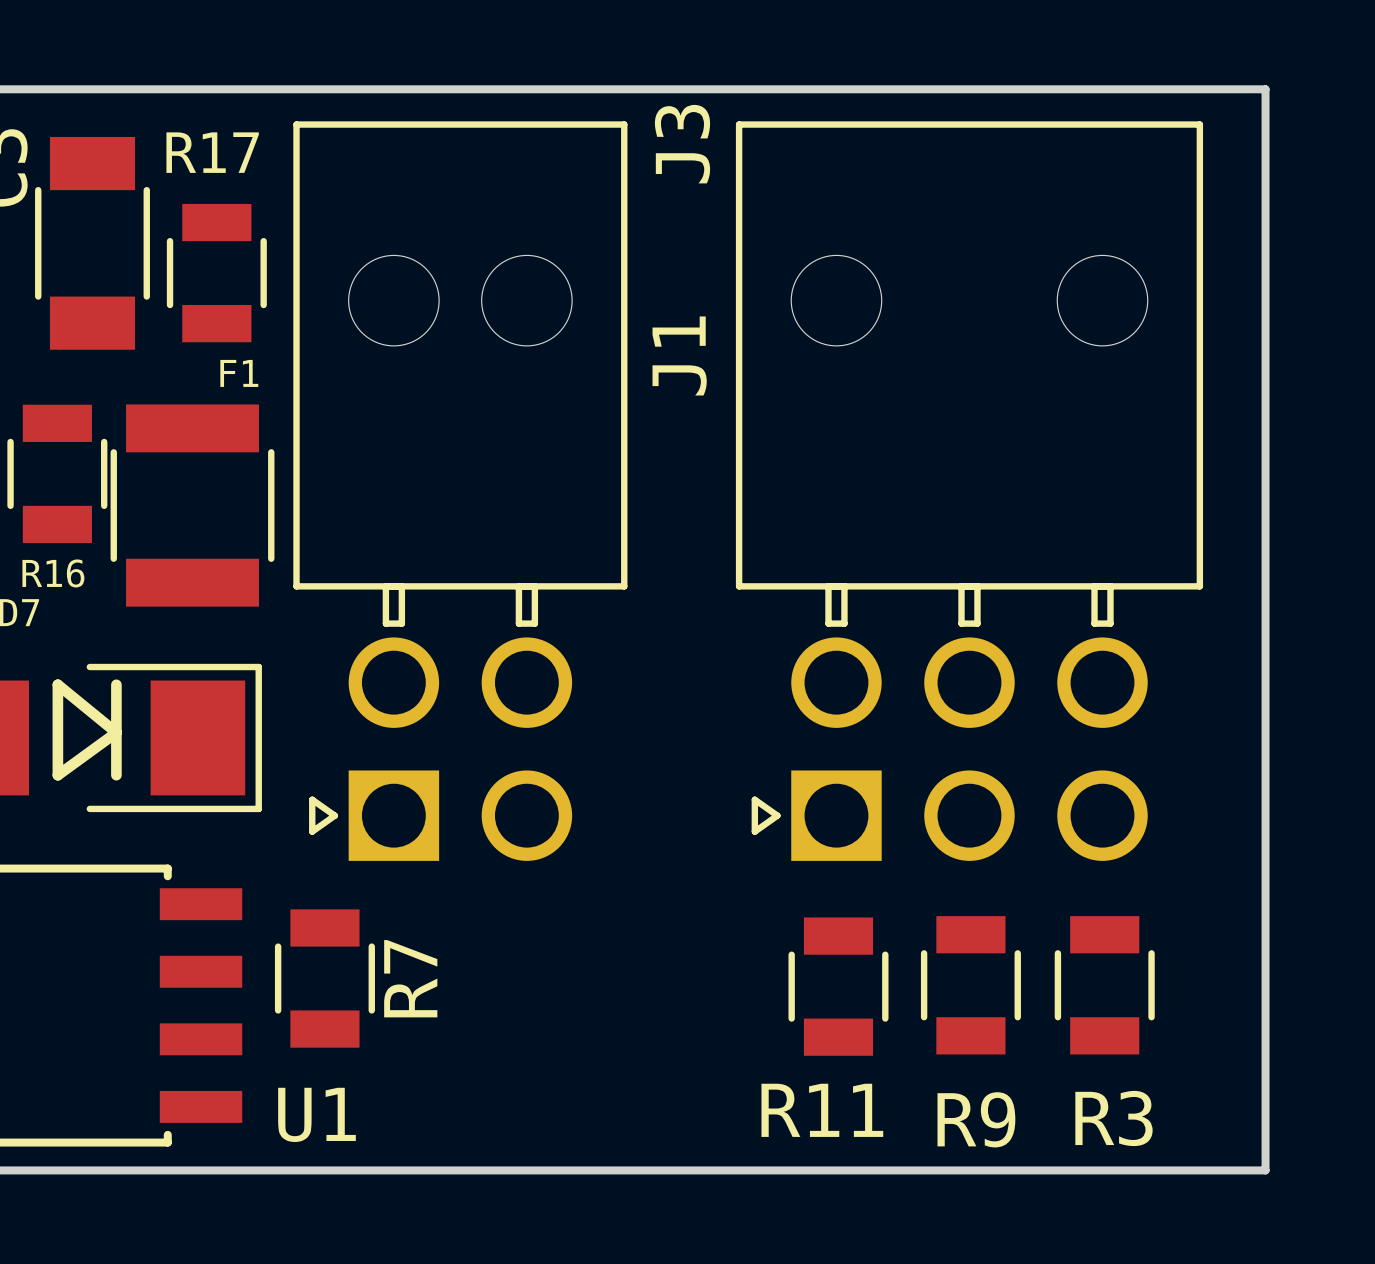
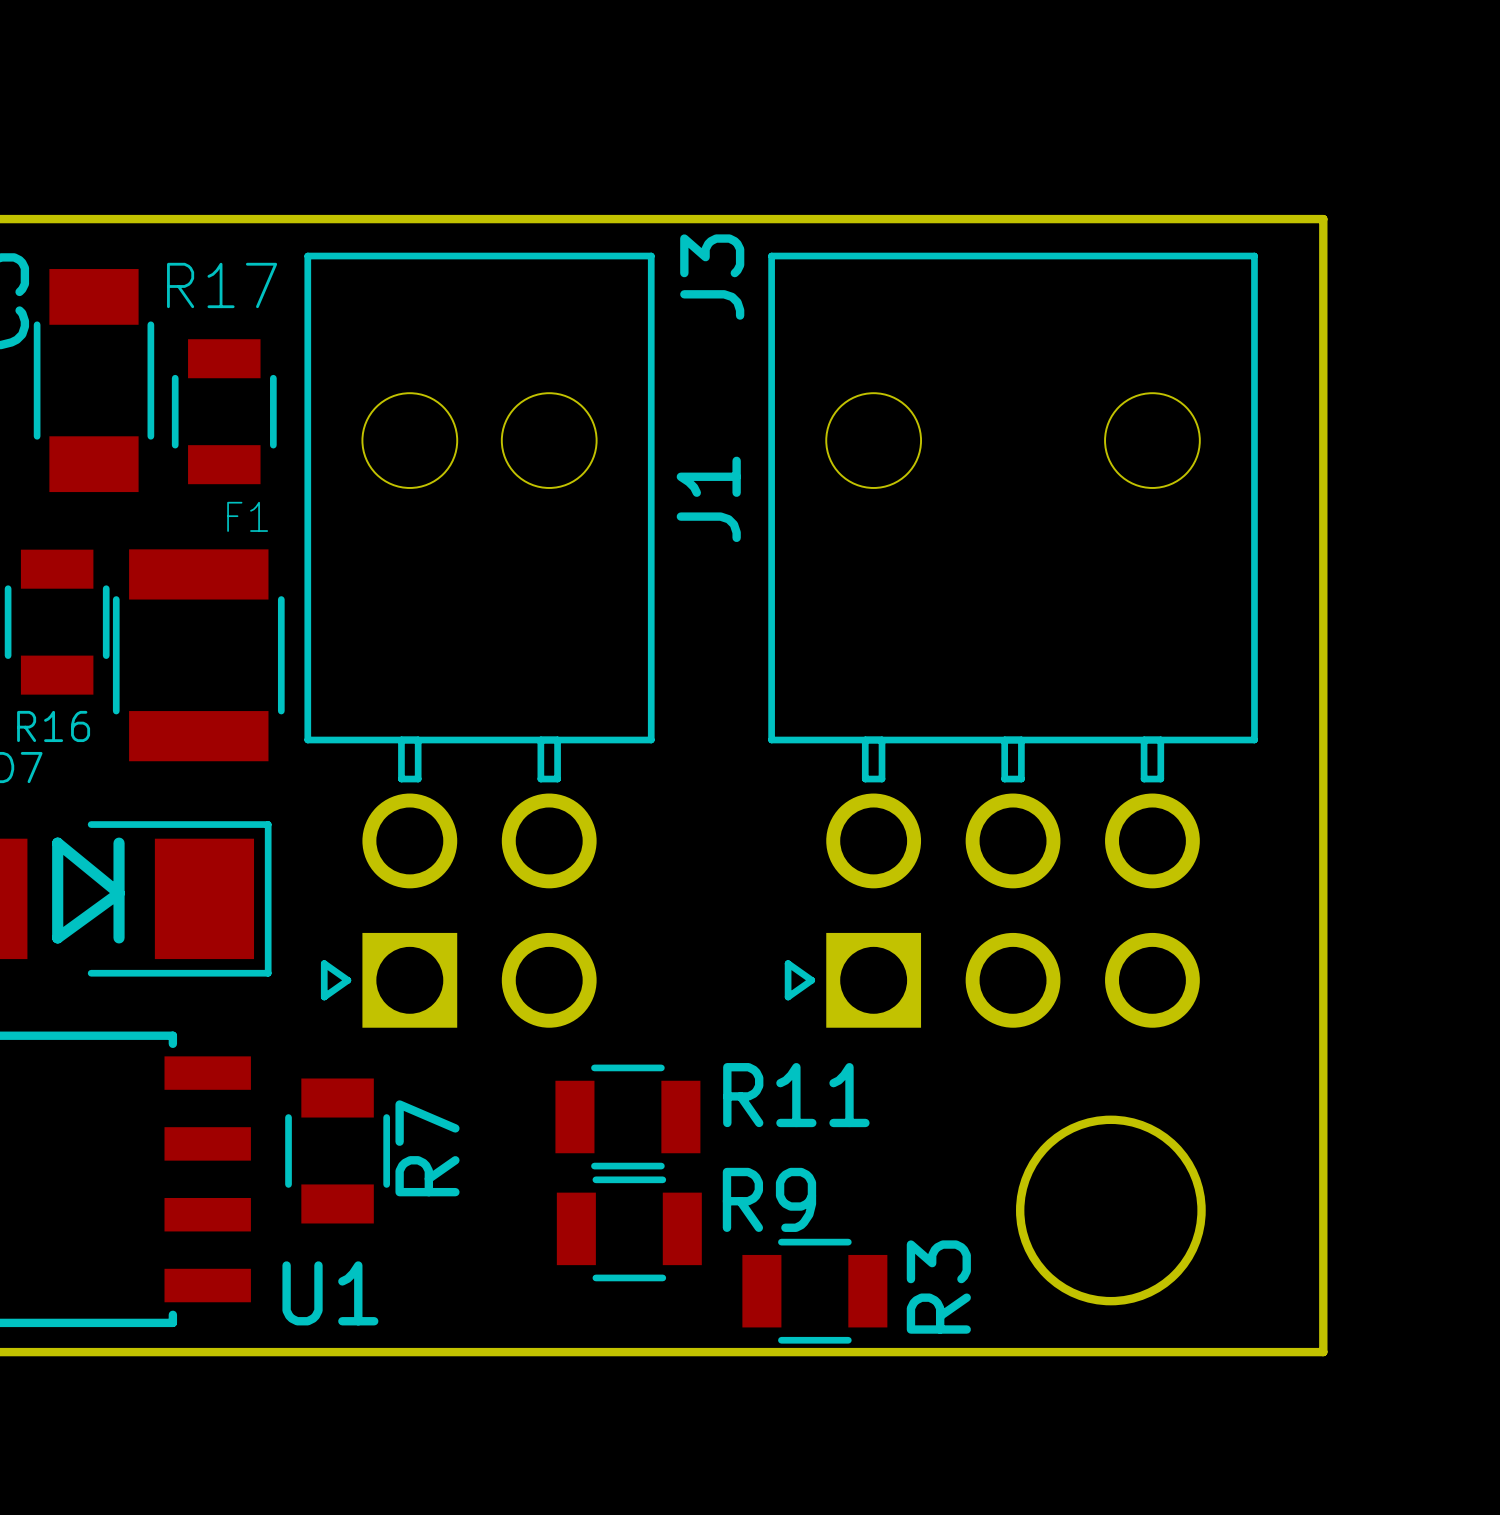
round board edge: none -> [1016, 1115, 1206, 1306]
R9 rotation: 0° (970, 985) -> 90° clockwise (629, 1228)
R9 position: (970, 985) -> (629, 1228)
R3 rotation: 0° (1104, 985) -> 90° clockwise (814, 1291)
R3 position: (1104, 985) -> (814, 1291)
R11 rotation: 0° (838, 986) -> 90° clockwise (627, 1117)
R11 position: (838, 986) -> (627, 1117)
R11 name position: R11 (822, 1110) -> R11 (796, 1095)
R3 name position: R3 (1113, 1118) -> R3 (938, 1287)
R9 name position: R9 (976, 1119) -> R9 (769, 1199)

